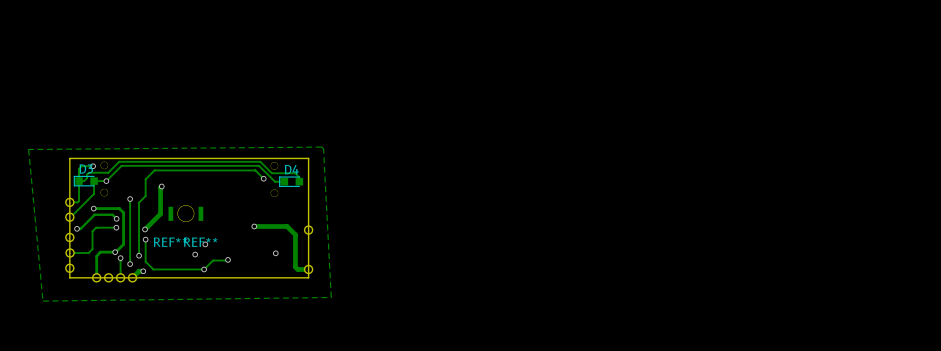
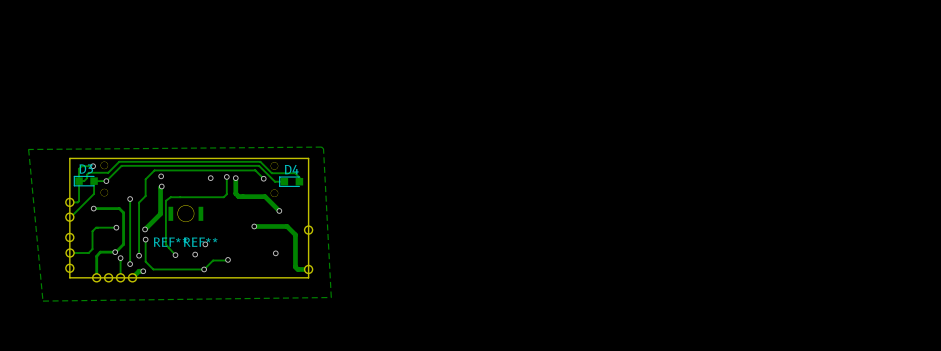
via: none -> (161, 176)
track: none -> (226, 176) (226, 194) (223, 197) (170, 197) (165, 200) (165, 244) (175, 255)
via: none -> (226, 176)
via: none -> (210, 178)
track: none -> (235, 178) (235, 193) (238, 196) (265, 196) (279, 210)
via: none -> (235, 178)
via: none -> (279, 210)
track: (116, 218) (112, 214) (94, 214) (80, 228) (77, 228) -> none
via: (116, 218) -> none
via: (77, 228) -> none
via: none -> (175, 255)

